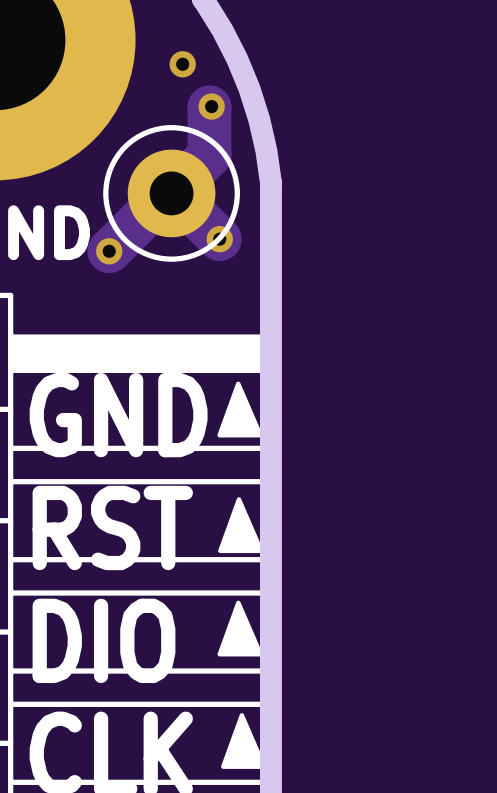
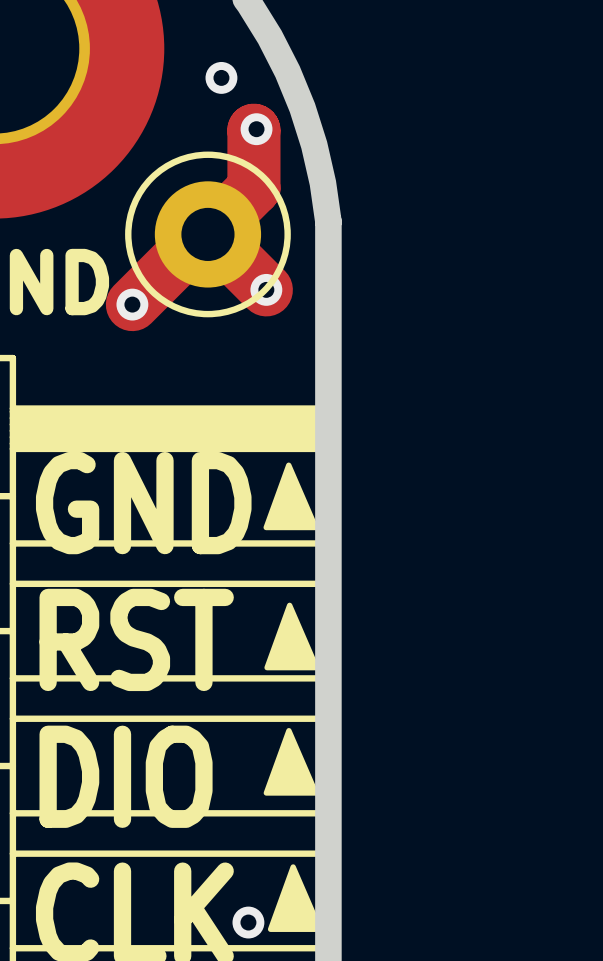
via: none -> (248, 922)

